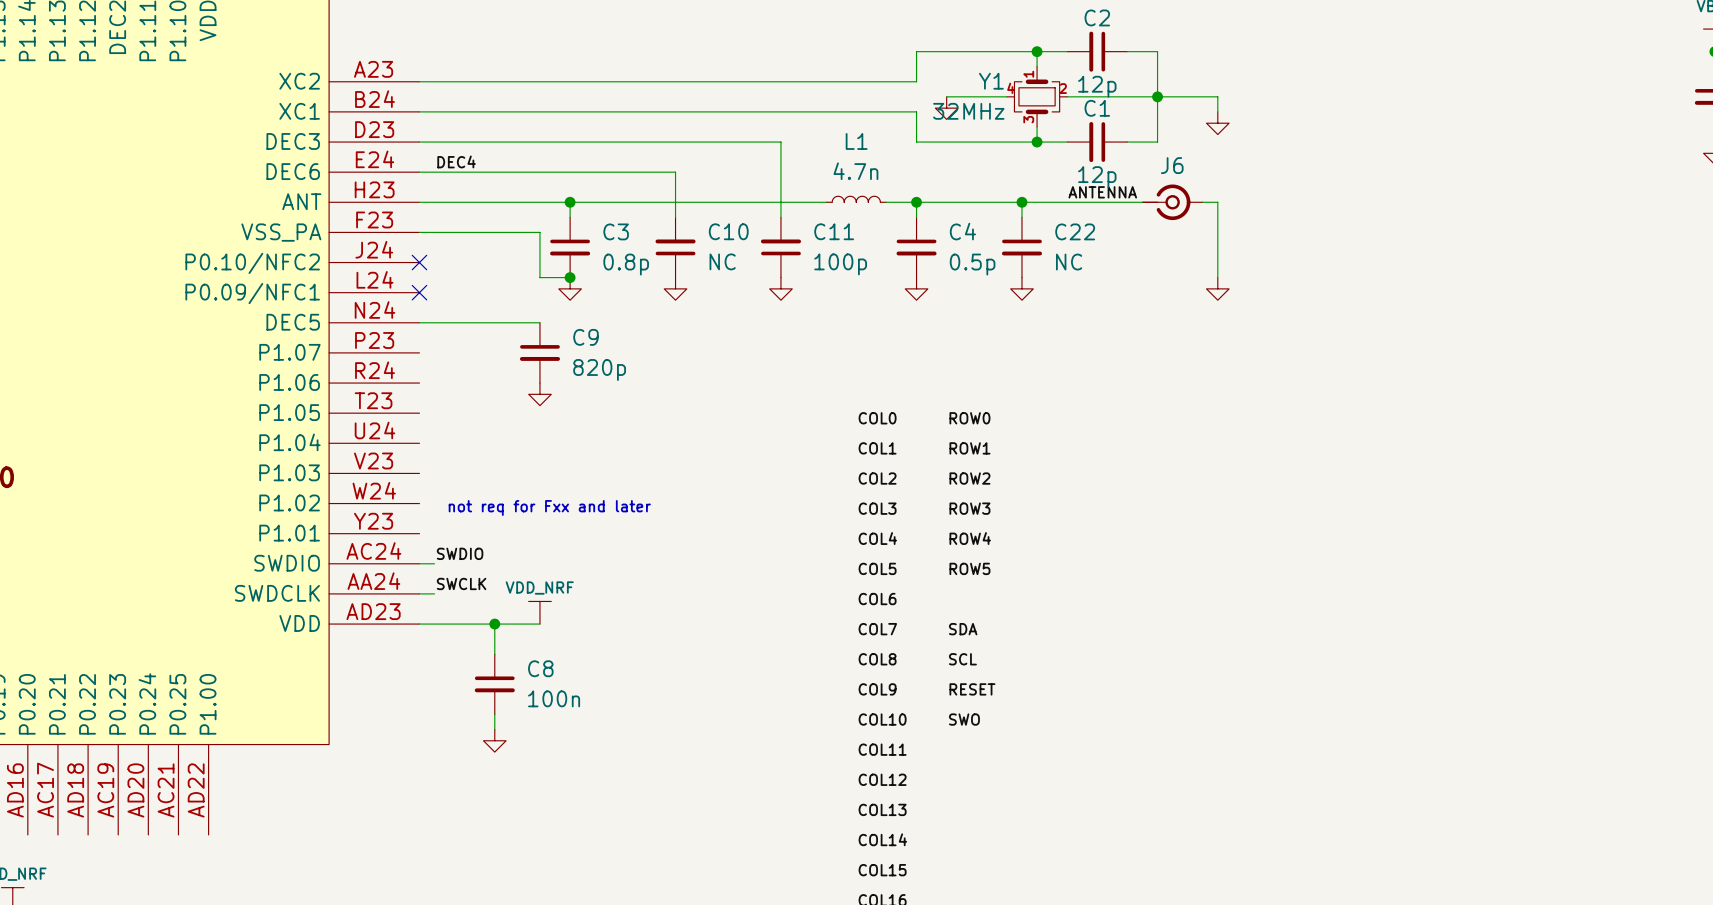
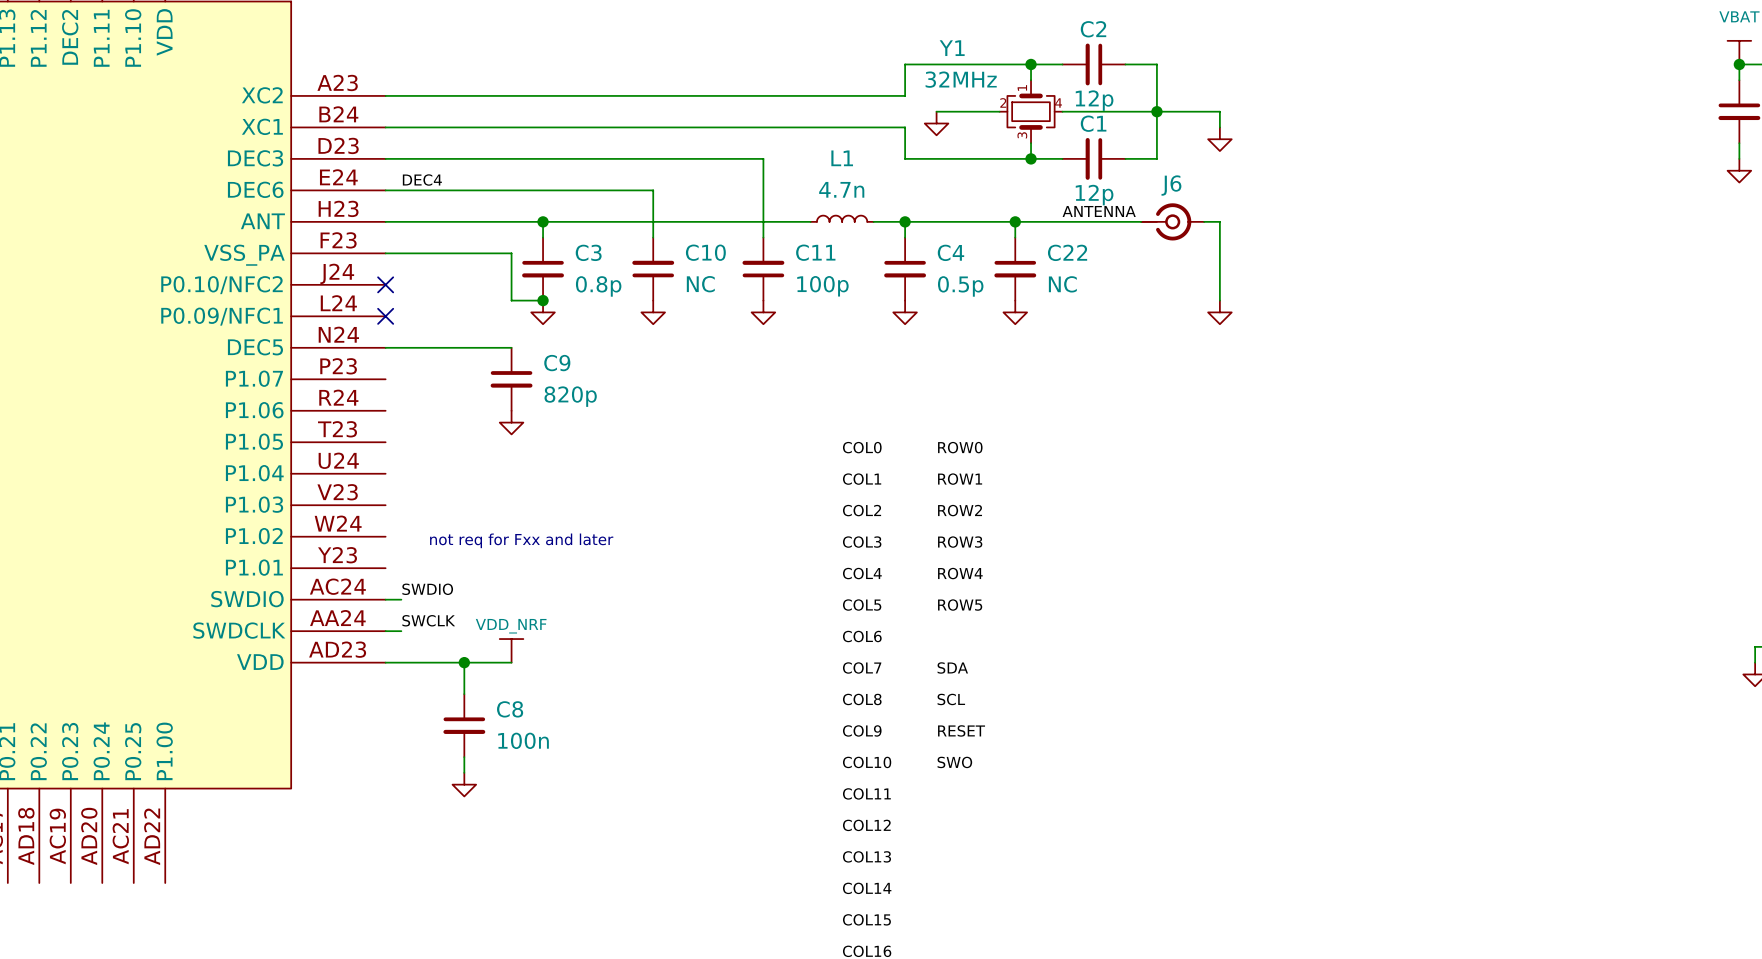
Y1 name position: Y1 (991, 81) -> Y1 (952, 48)
Y1 flip: as is (1037, 96) -> left-right (1031, 111)
Y1 value position: 32MHz (968, 111) -> 32MHz (961, 79)

